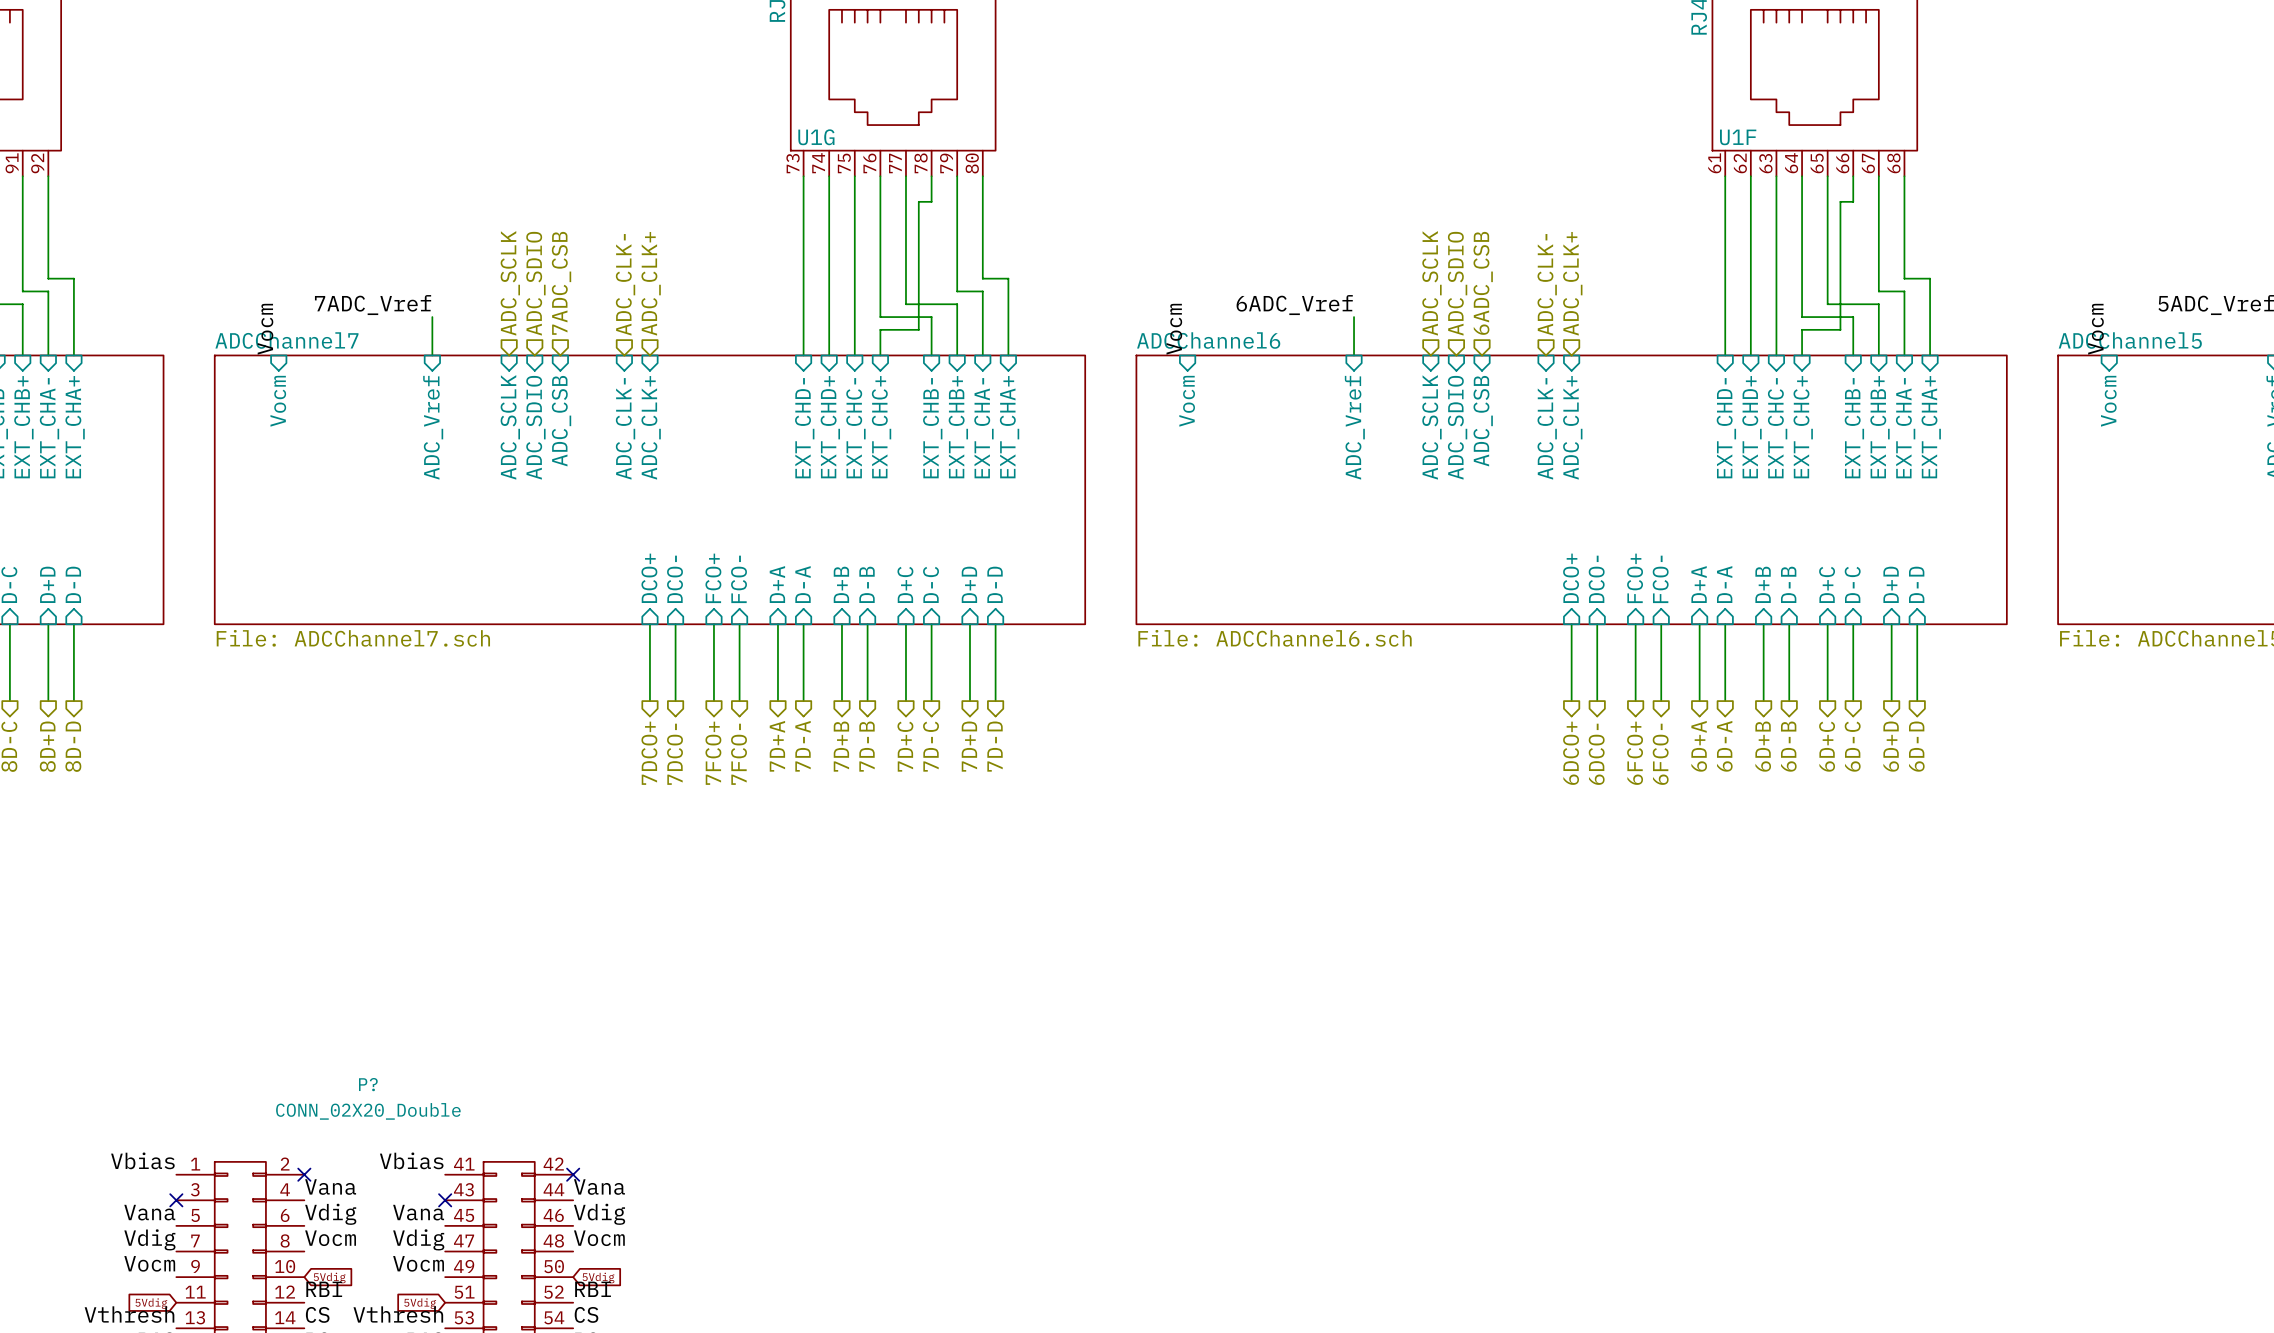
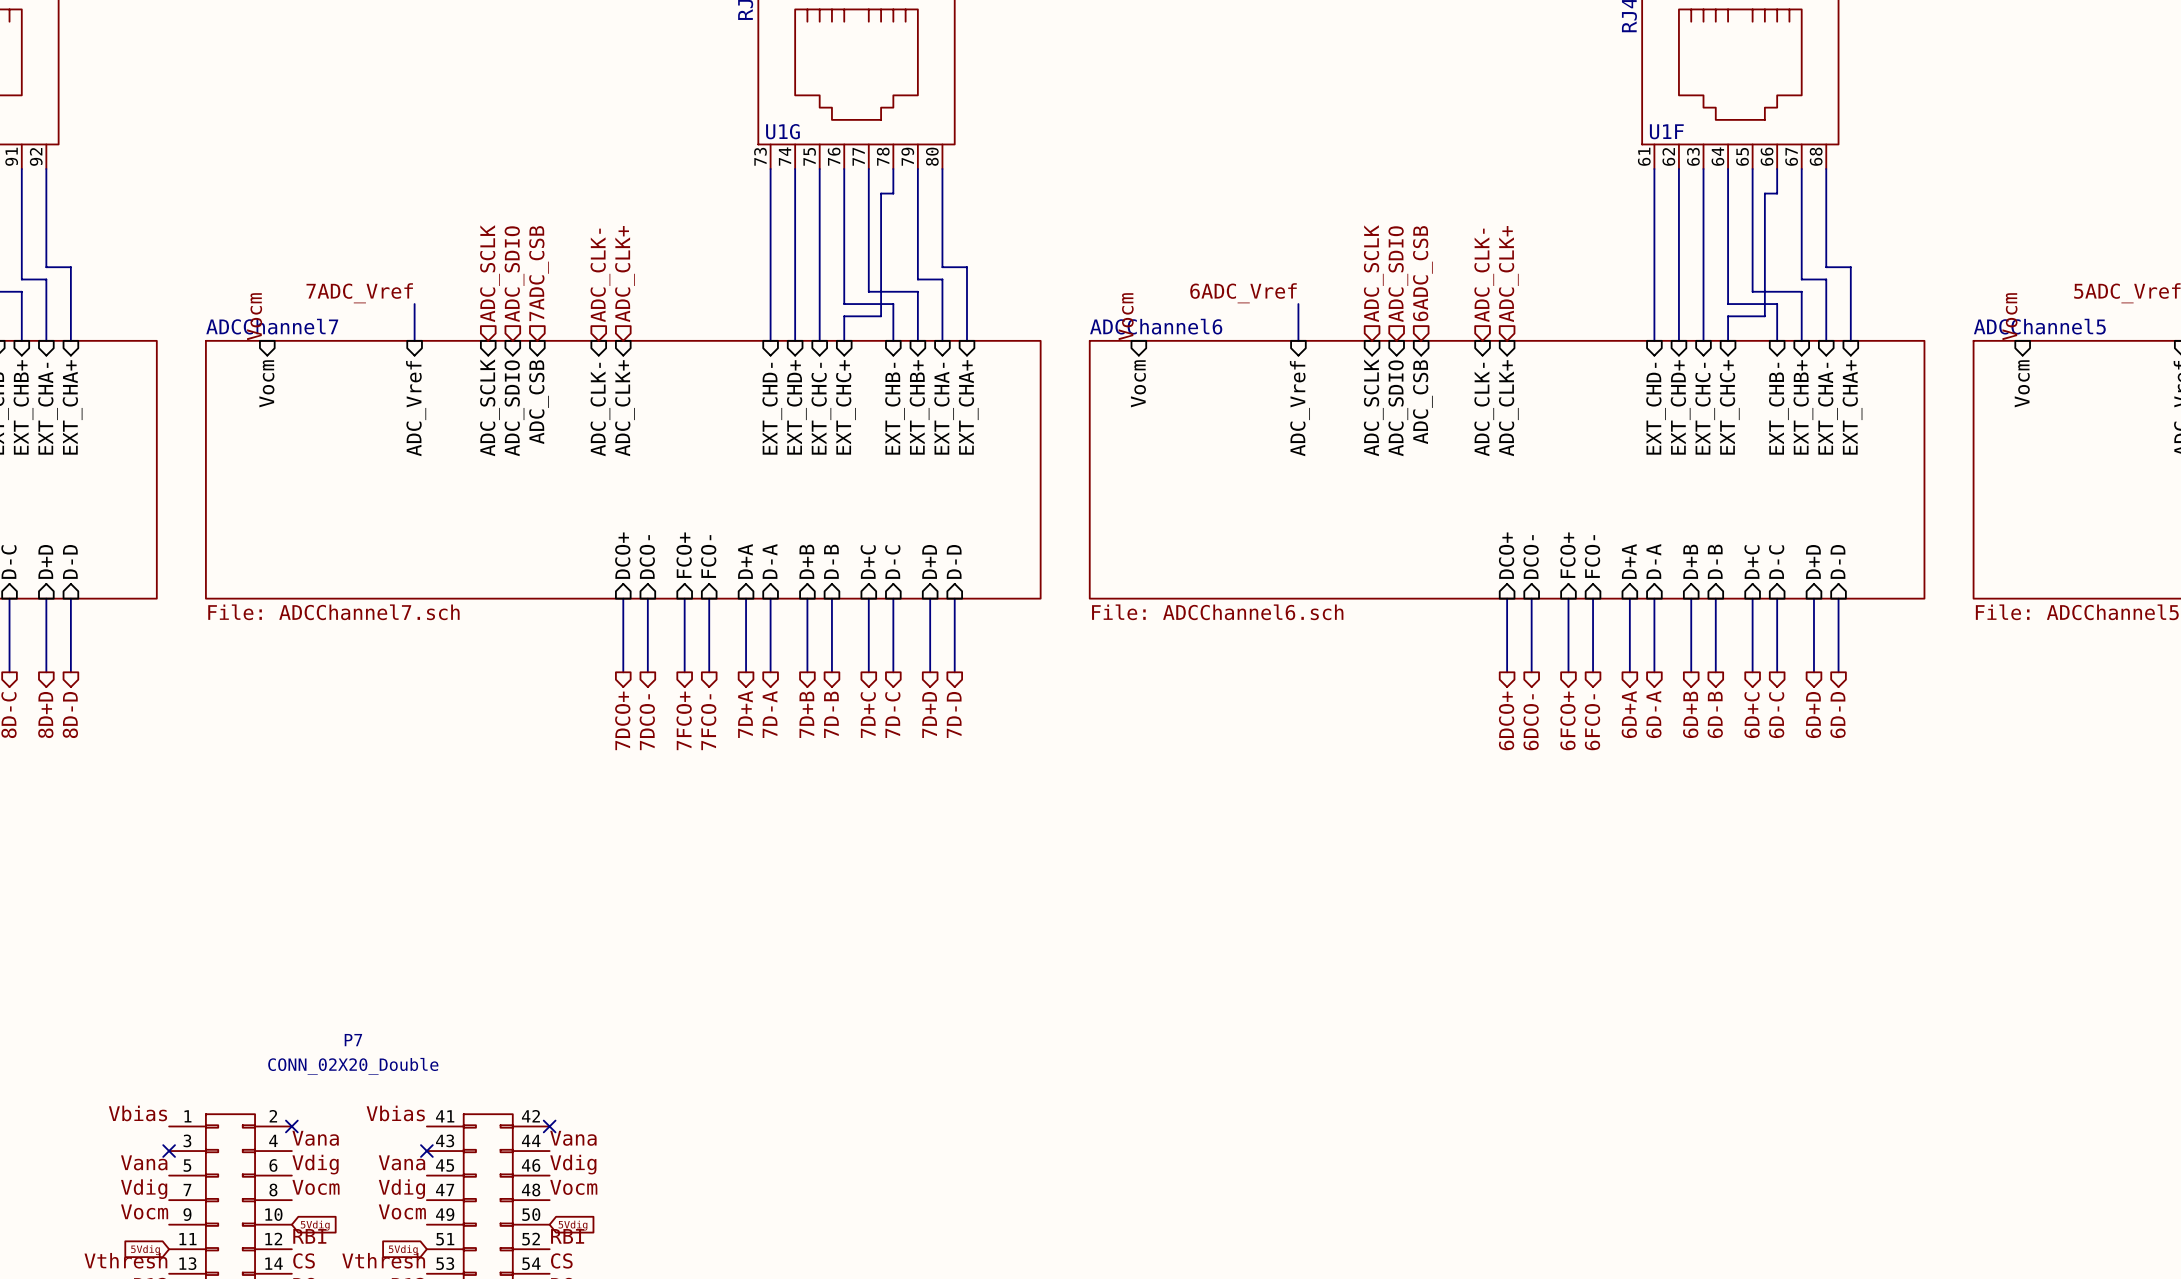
P? name: P? (368, 1084) -> P7 (353, 1040)

